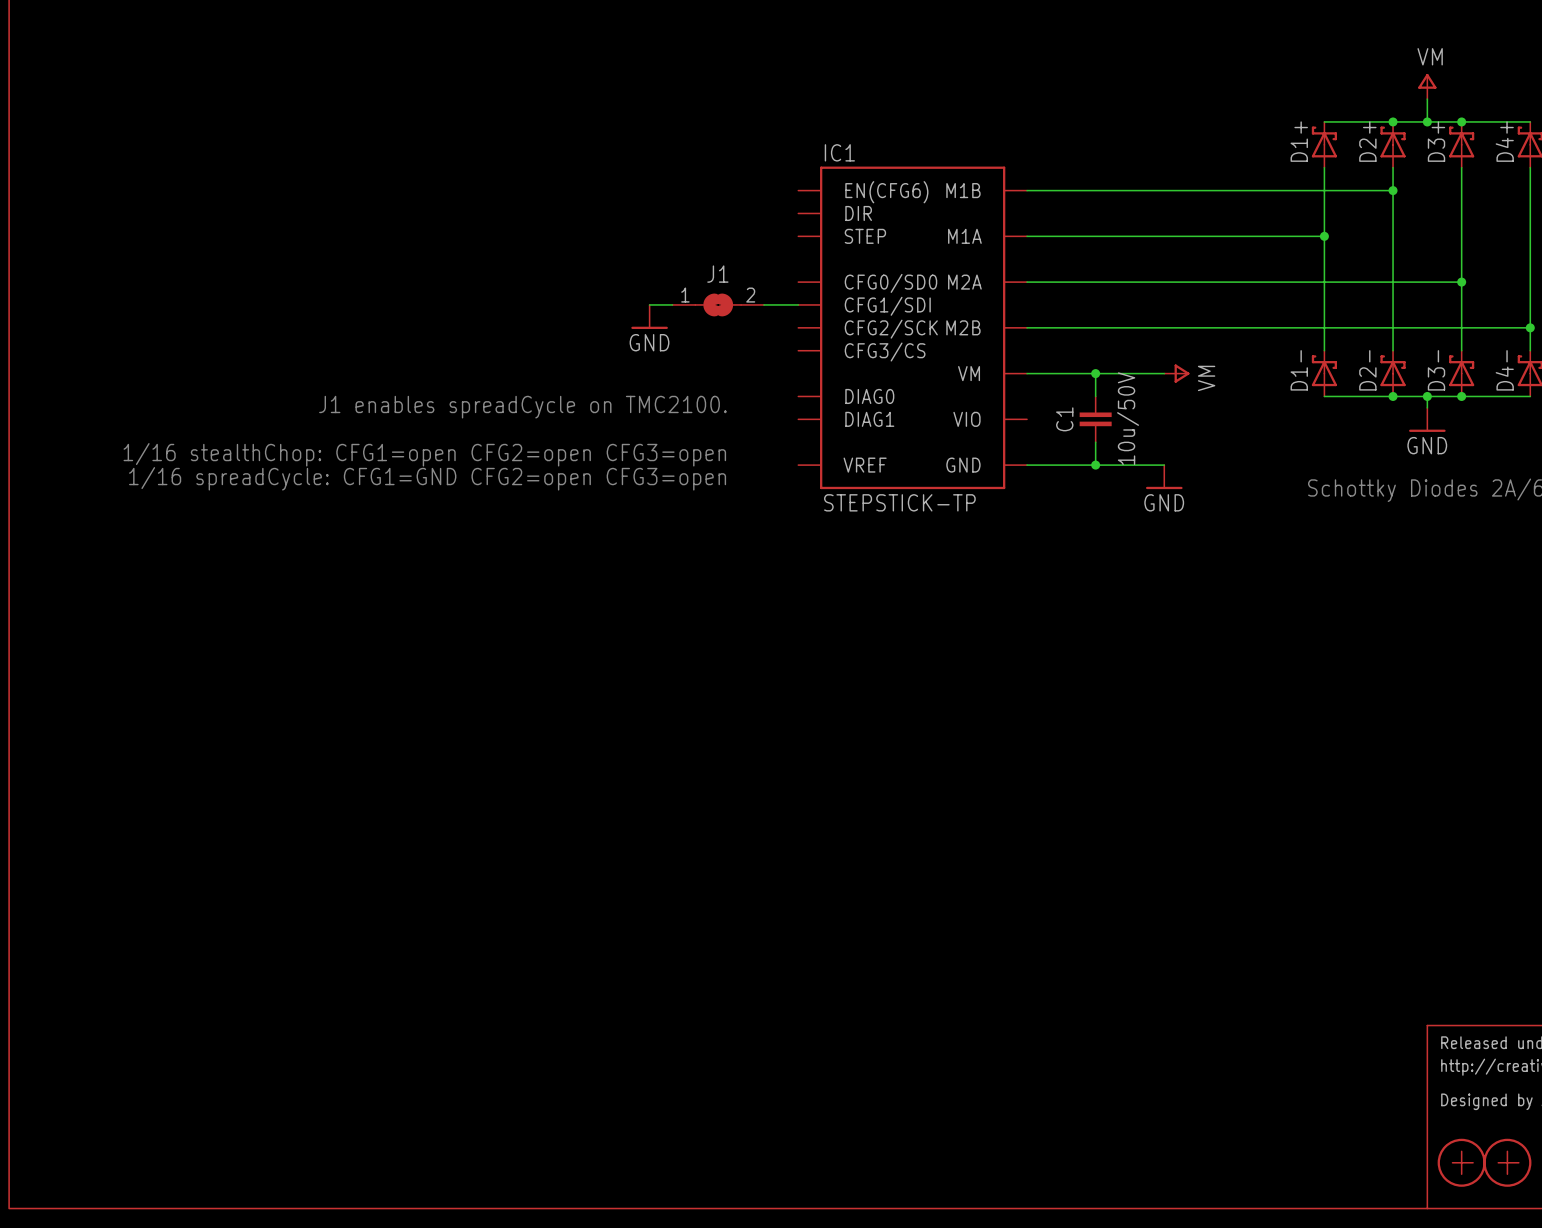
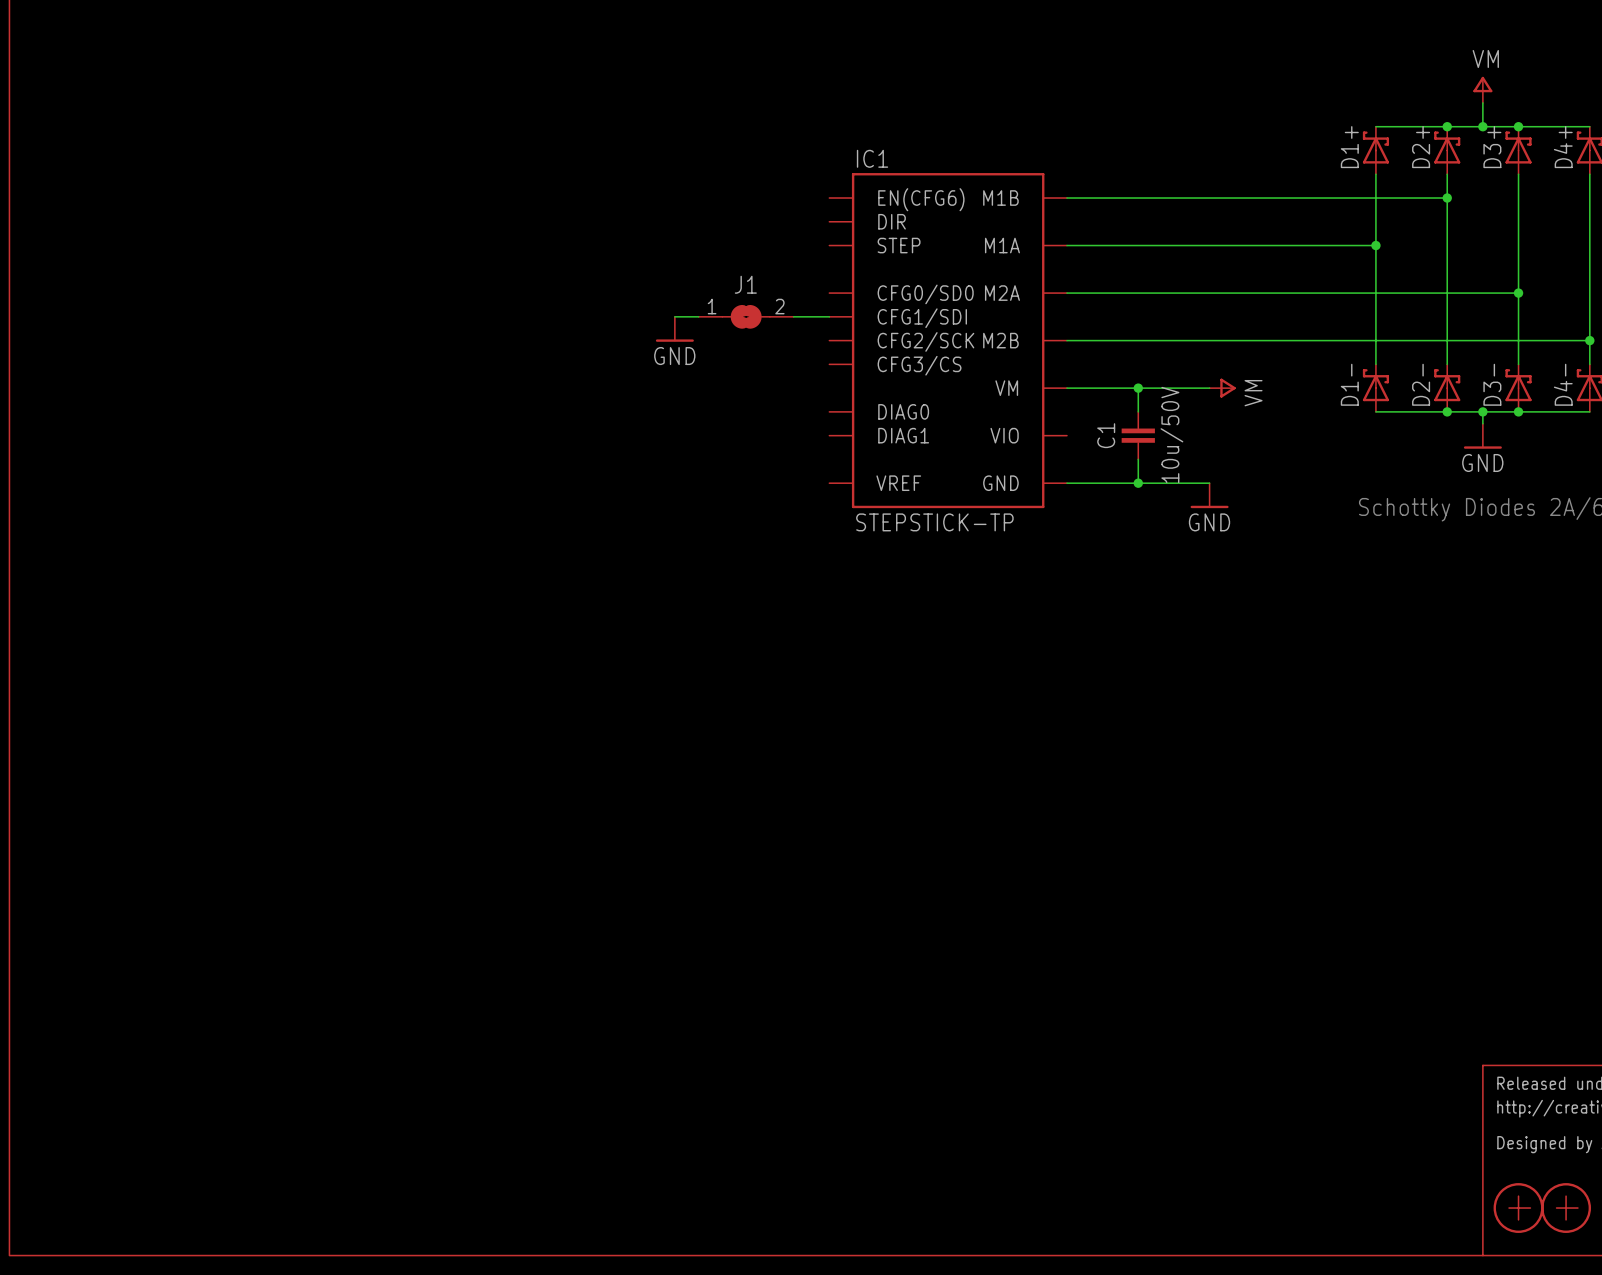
text: J1 enables spreadCycle on TMC2100. (522, 407) -> none
text: 1/16 stealthChop: CFG1=open CFG2=open CFG3=open (424, 454) -> none
text: 1/16 spreadCycle: CFG1=GND CFG2=open CFG3=open (427, 478) -> none

